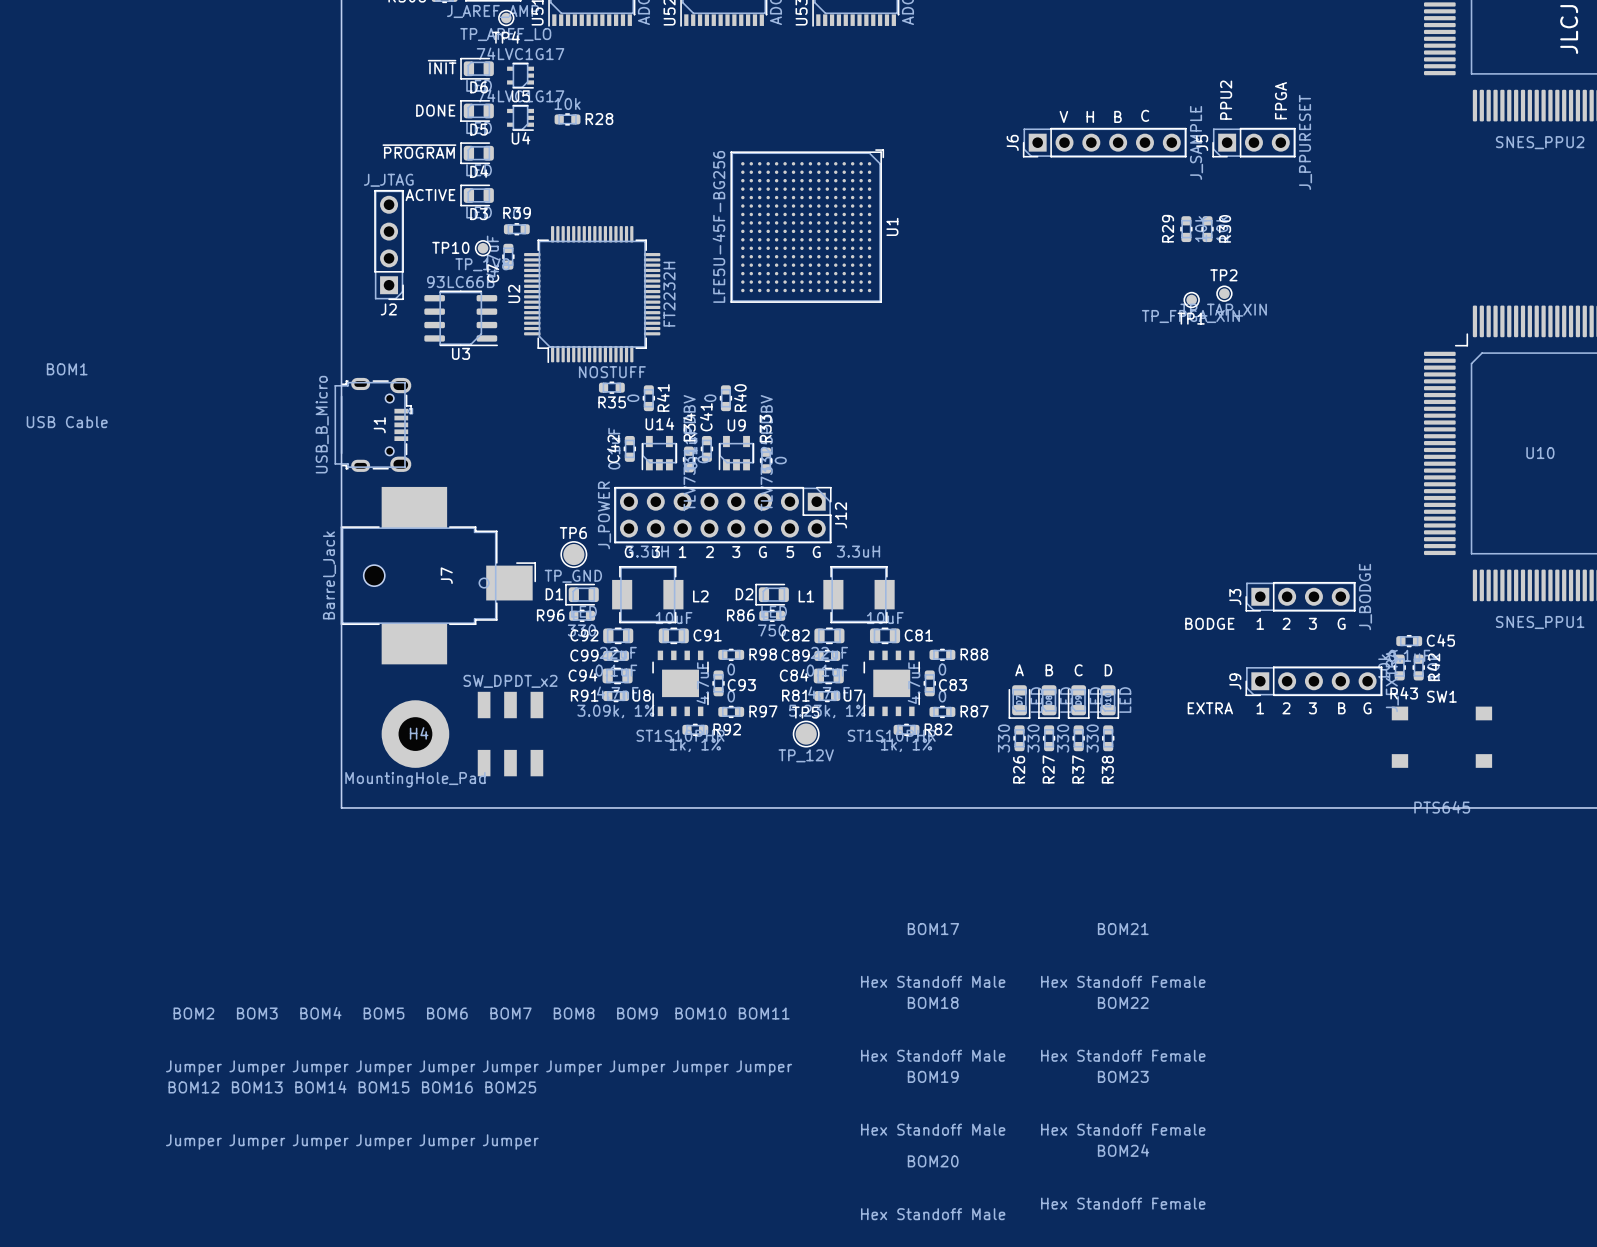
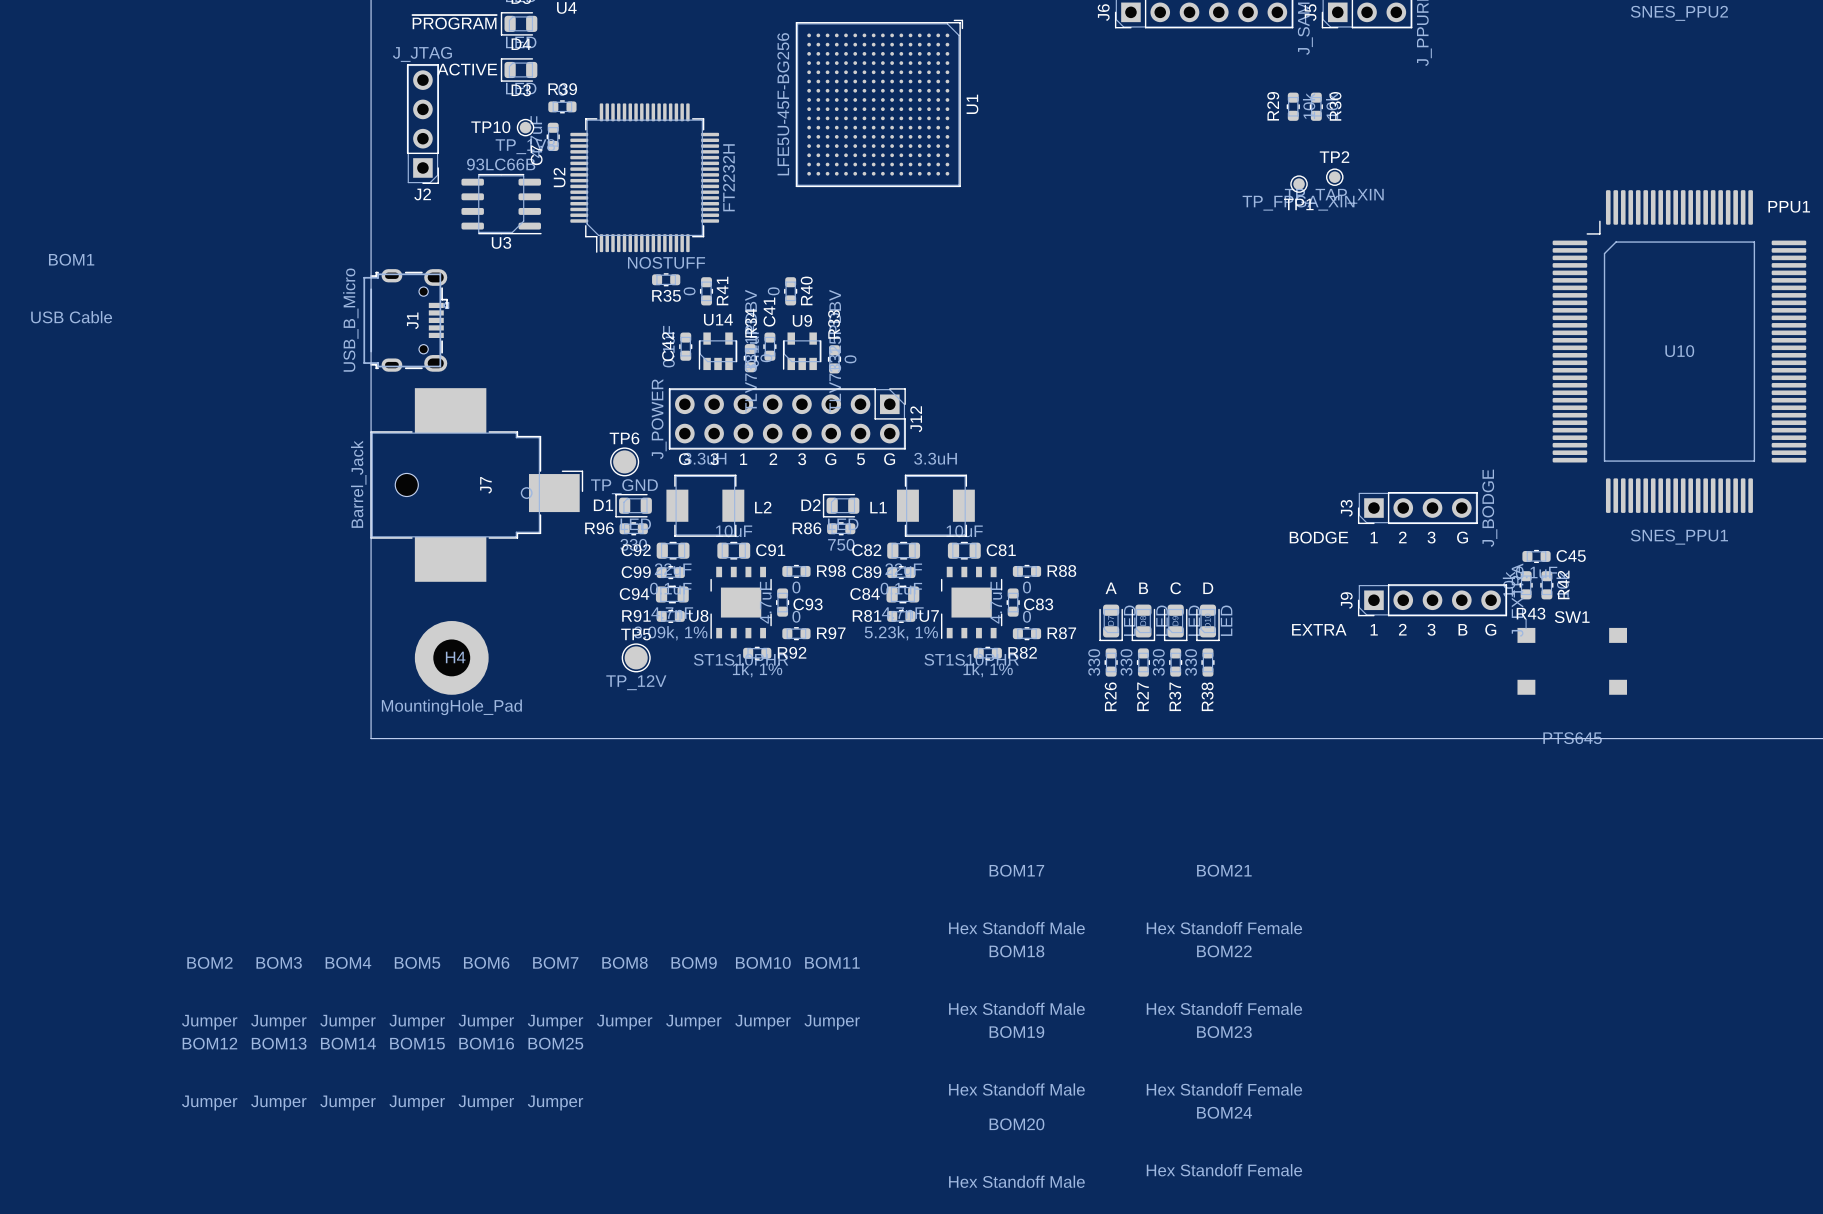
part: SW_DPDT_x2 (510, 734) -> none
TP5 position: (806, 734) -> (636, 657)

